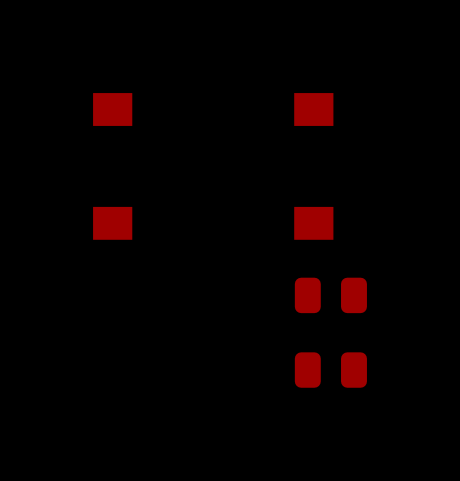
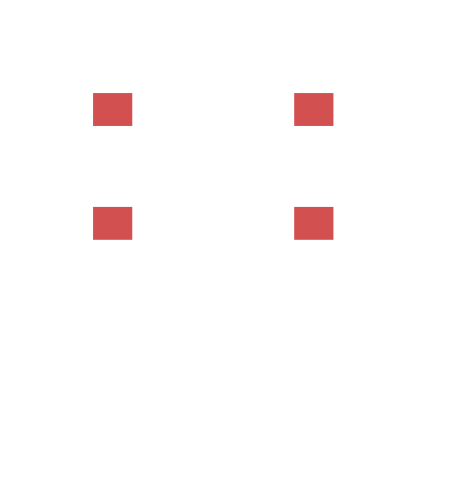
part: (330, 295) -> none
part: (330, 370) -> none

